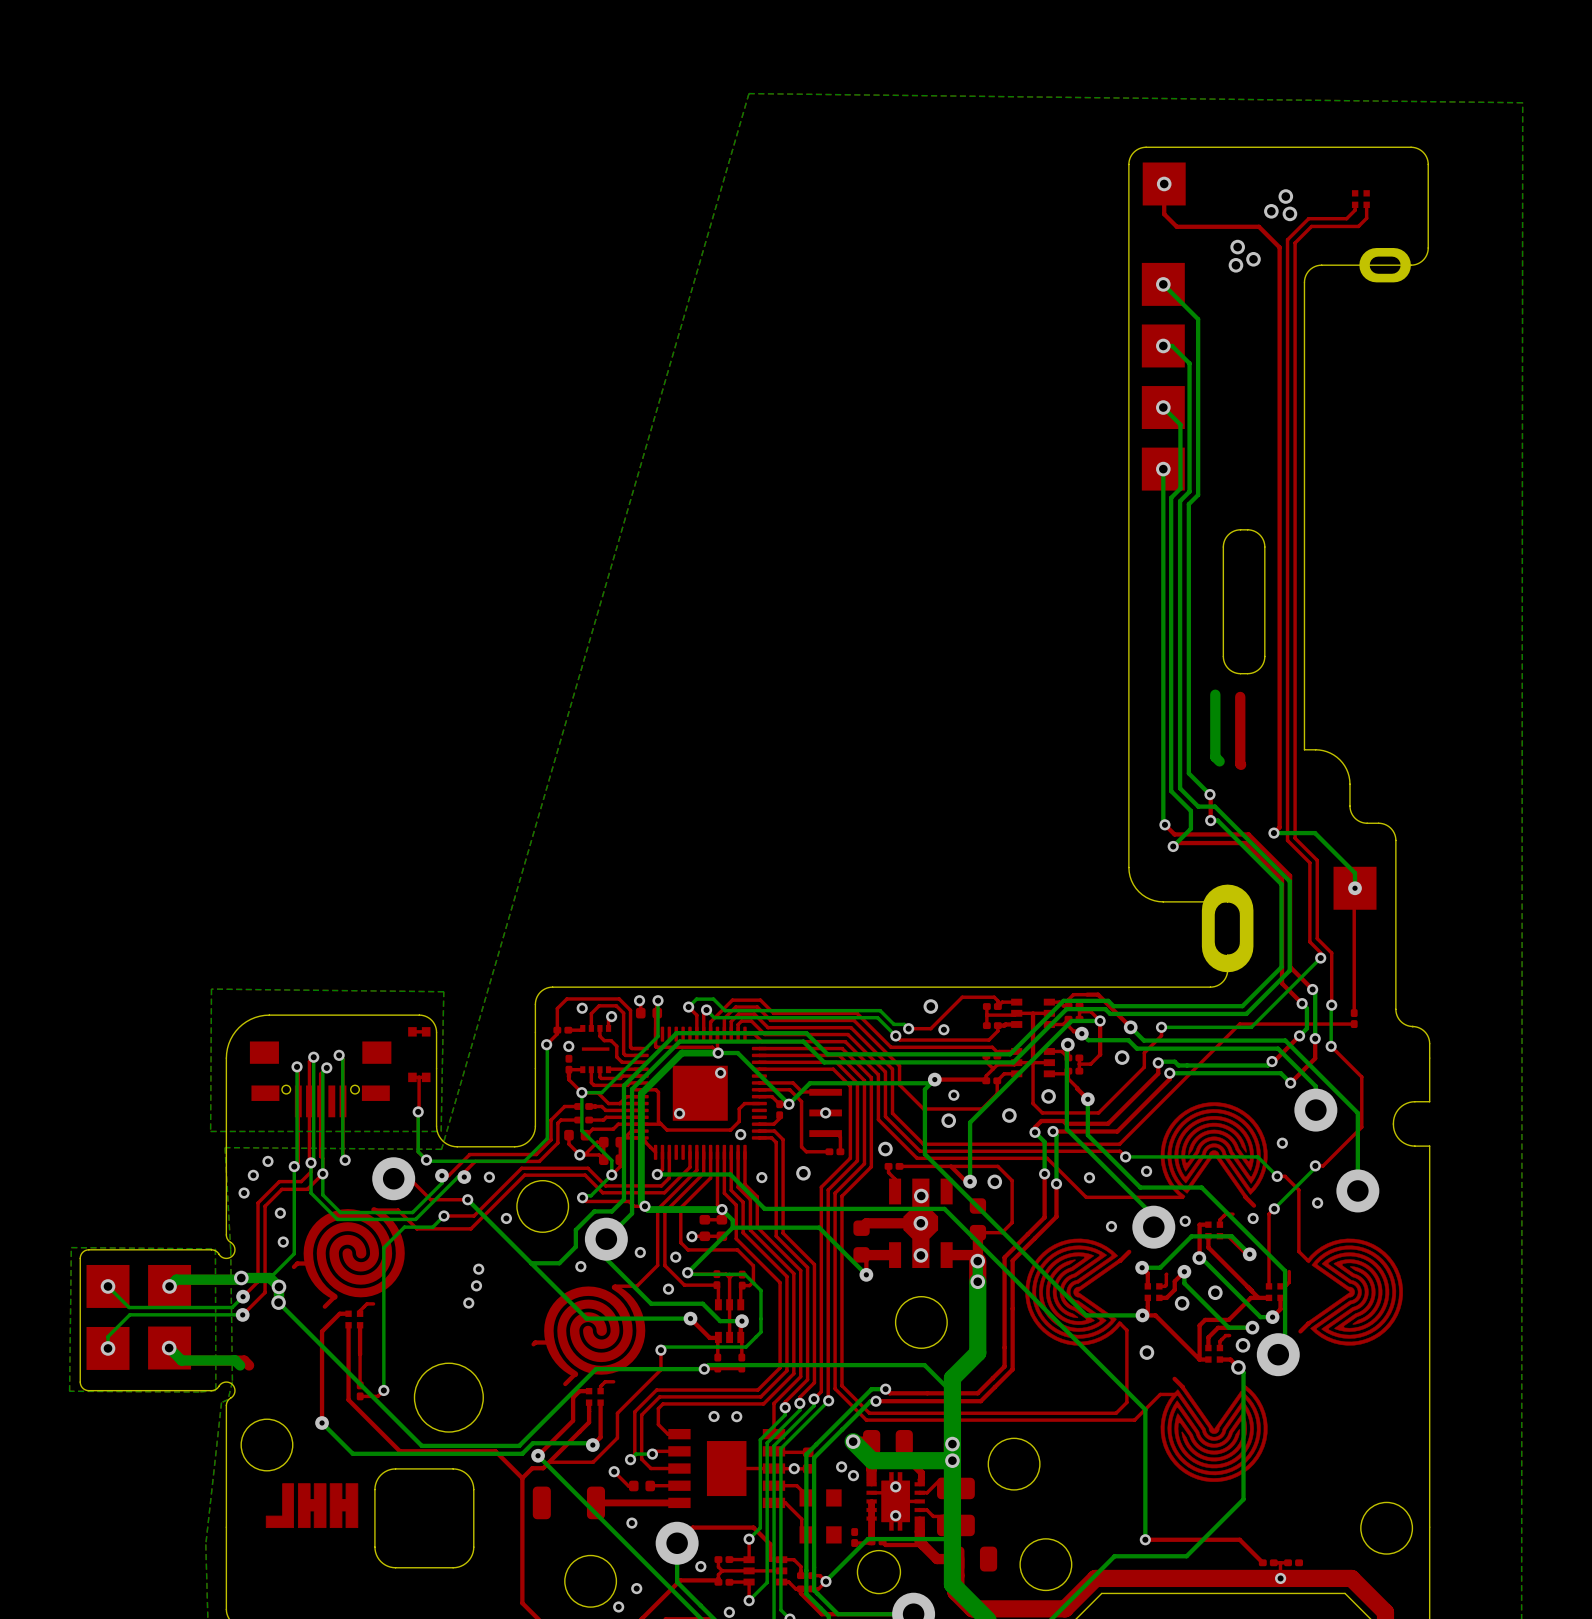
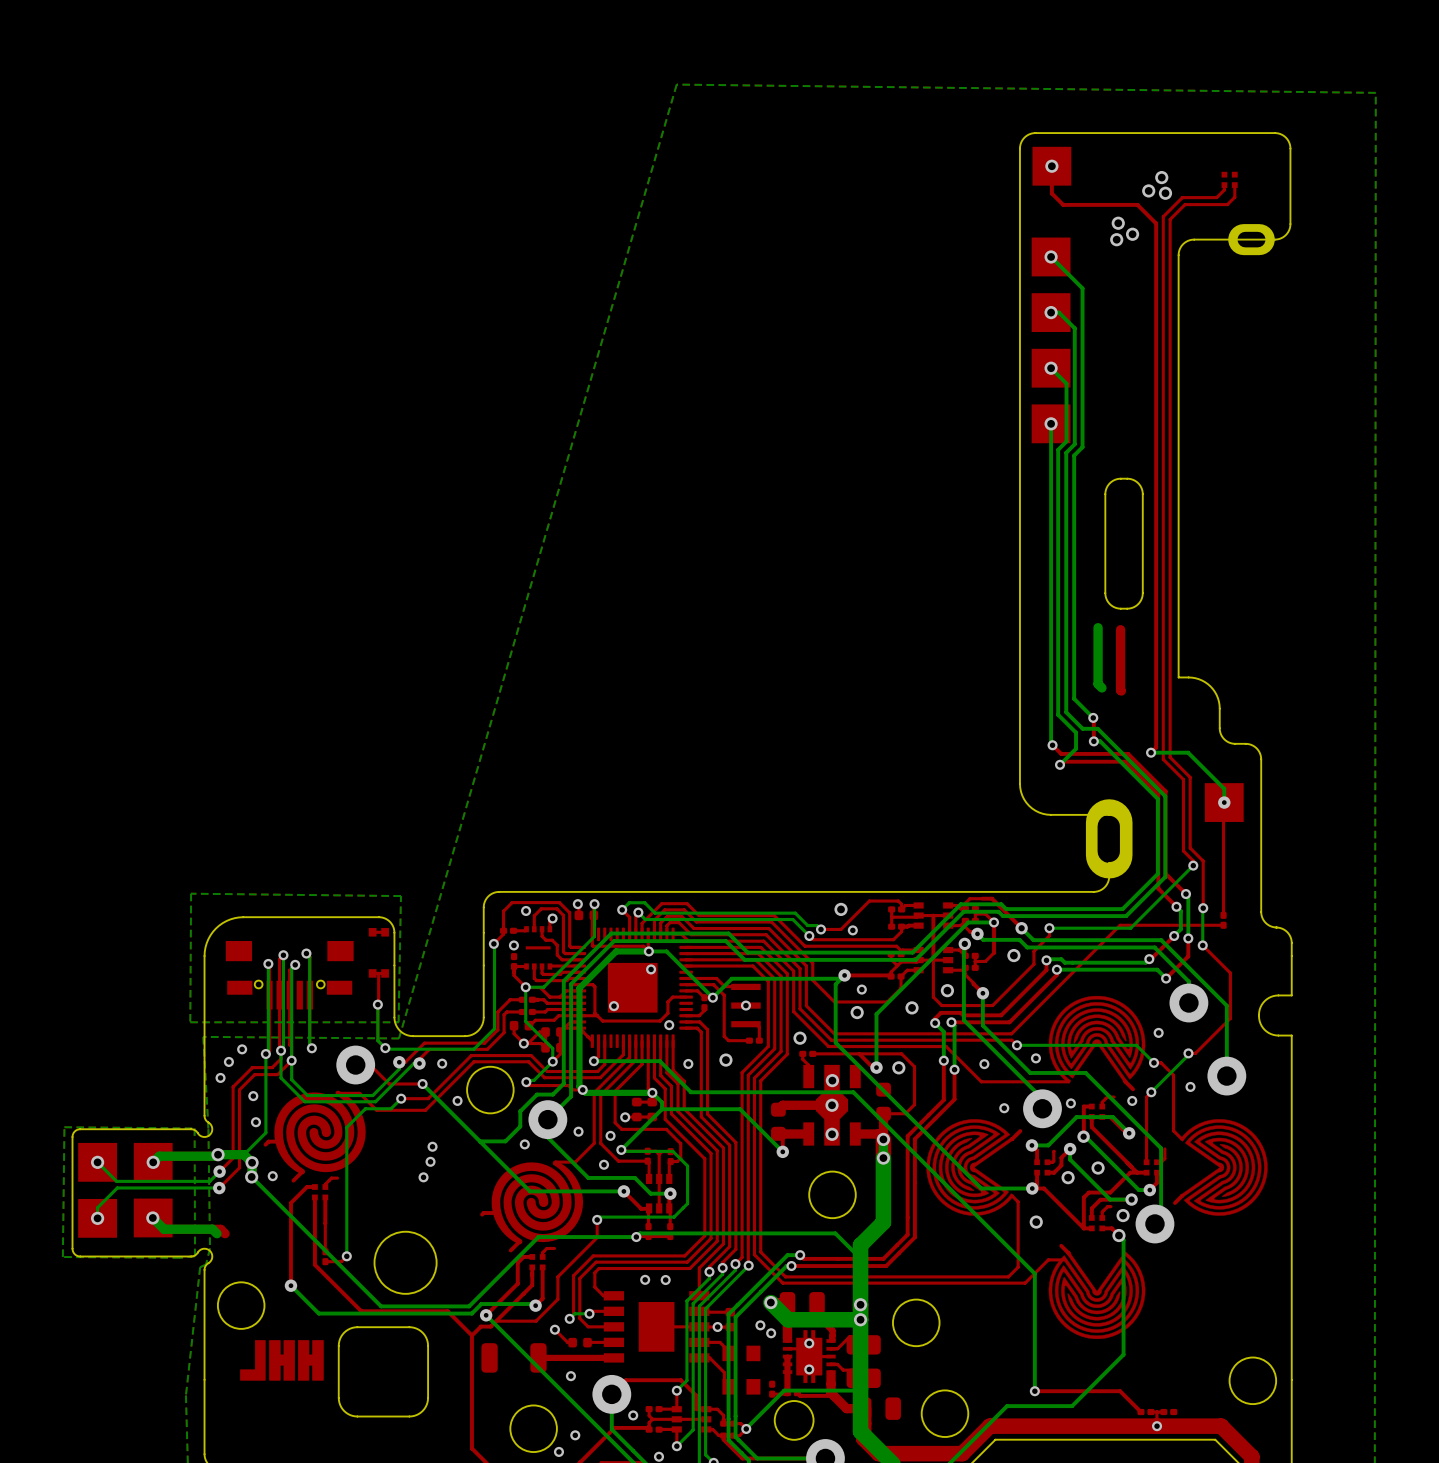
via: none -> (272, 1176)

